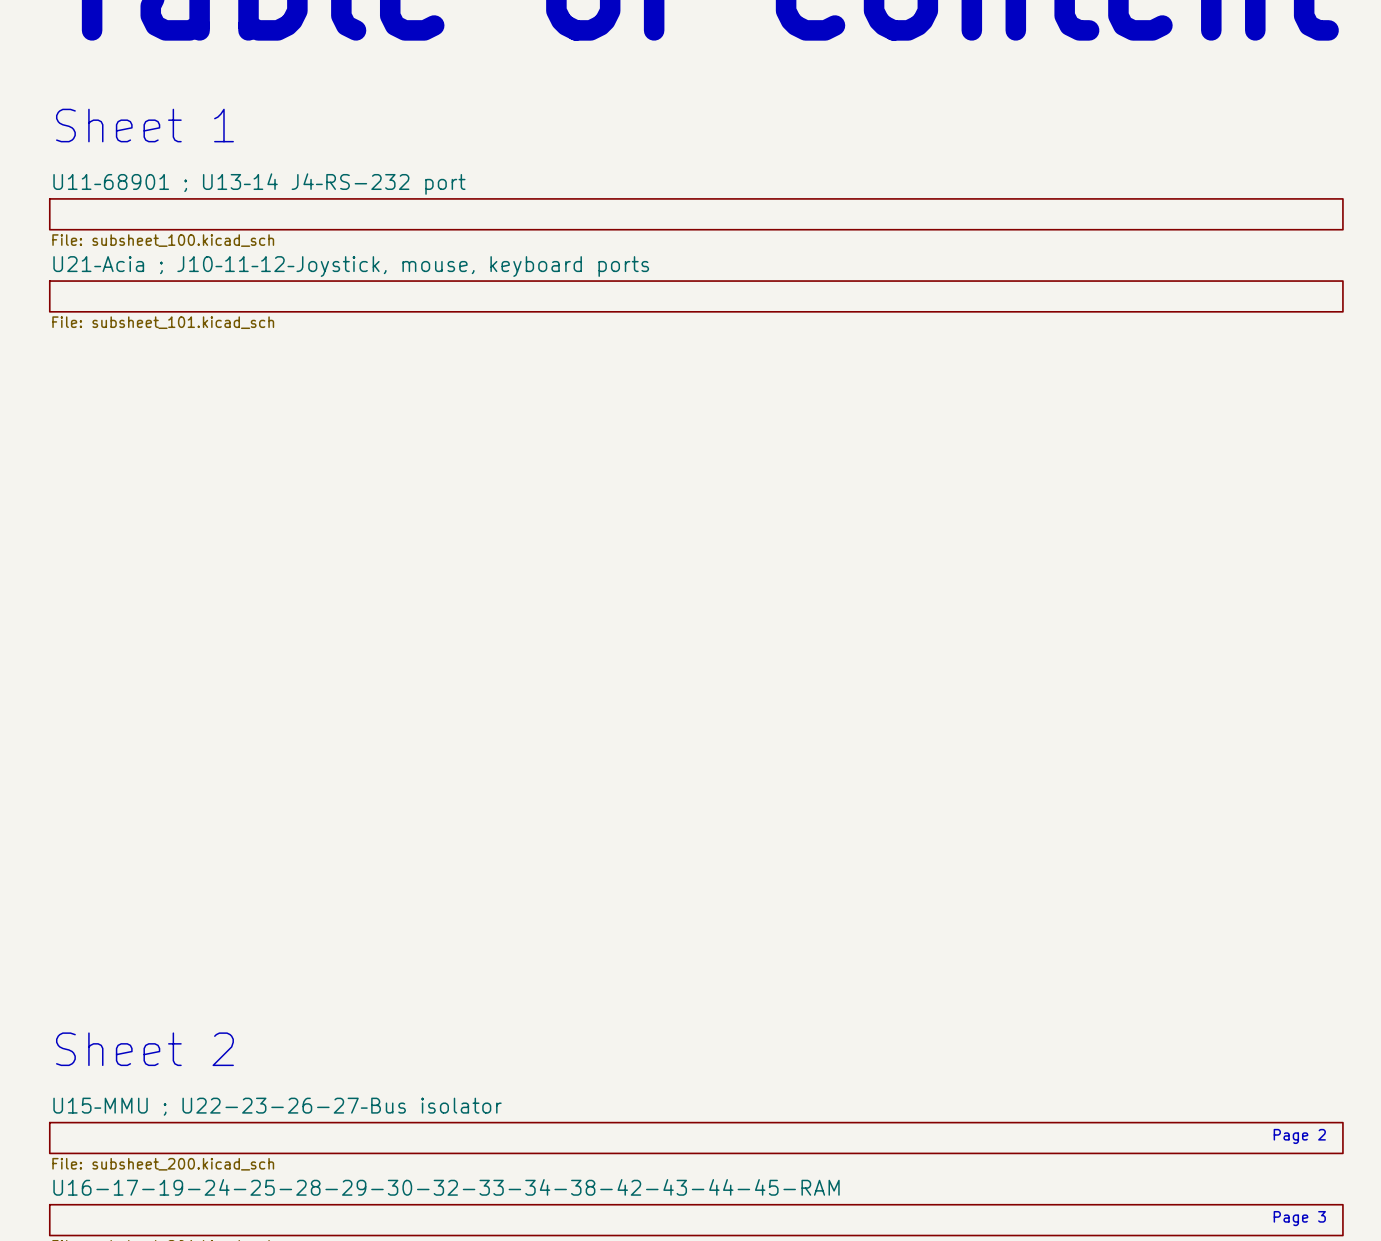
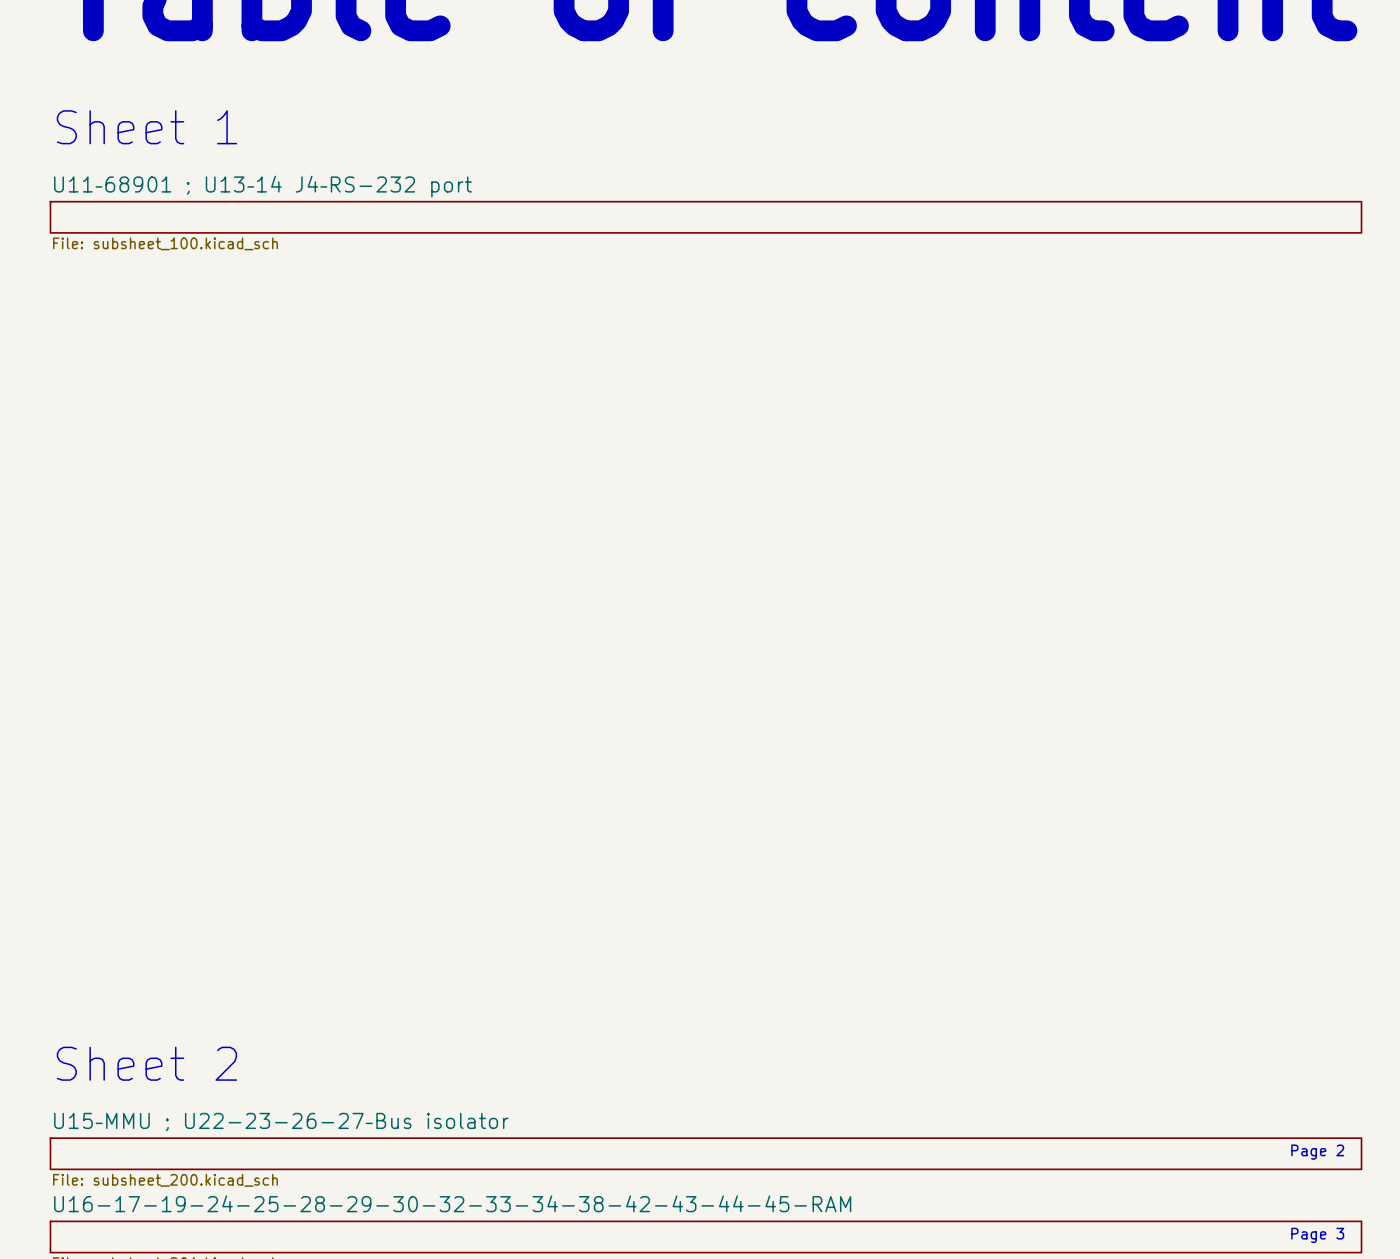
sheet U21–Acia ; J10–11–12–Joystick, mouse, keyboard ports: File: subsheet_101.kicad_sch (696, 296) -> none

